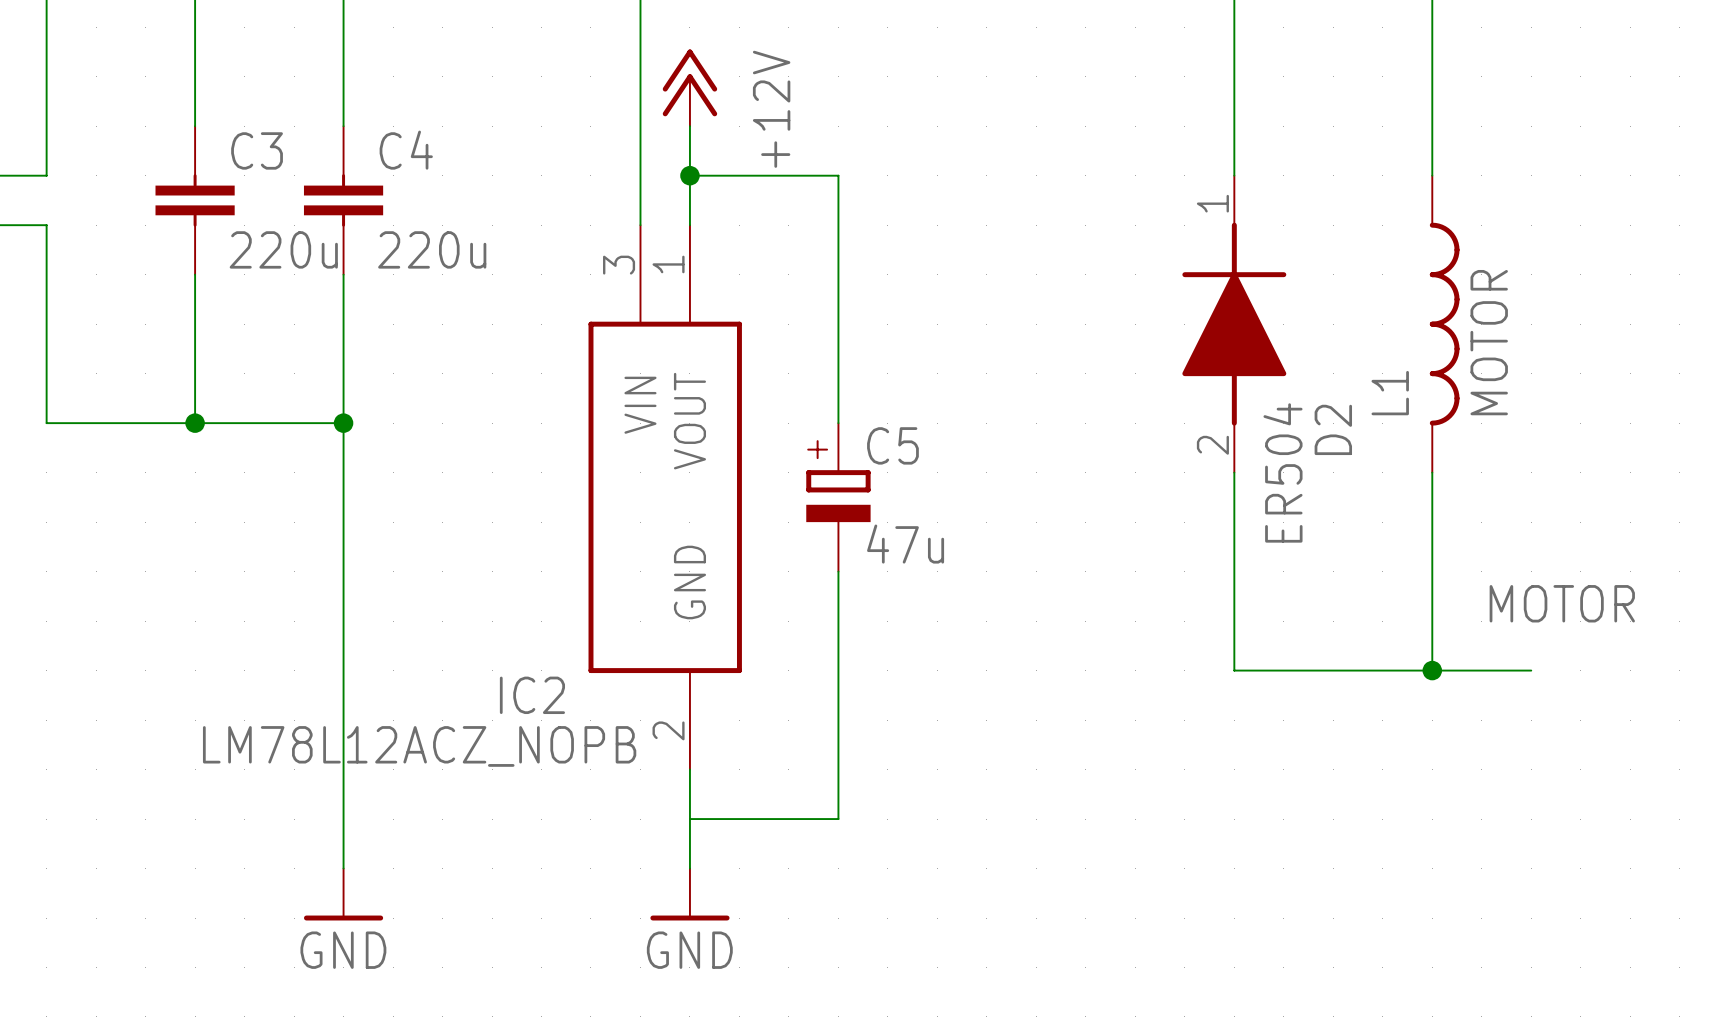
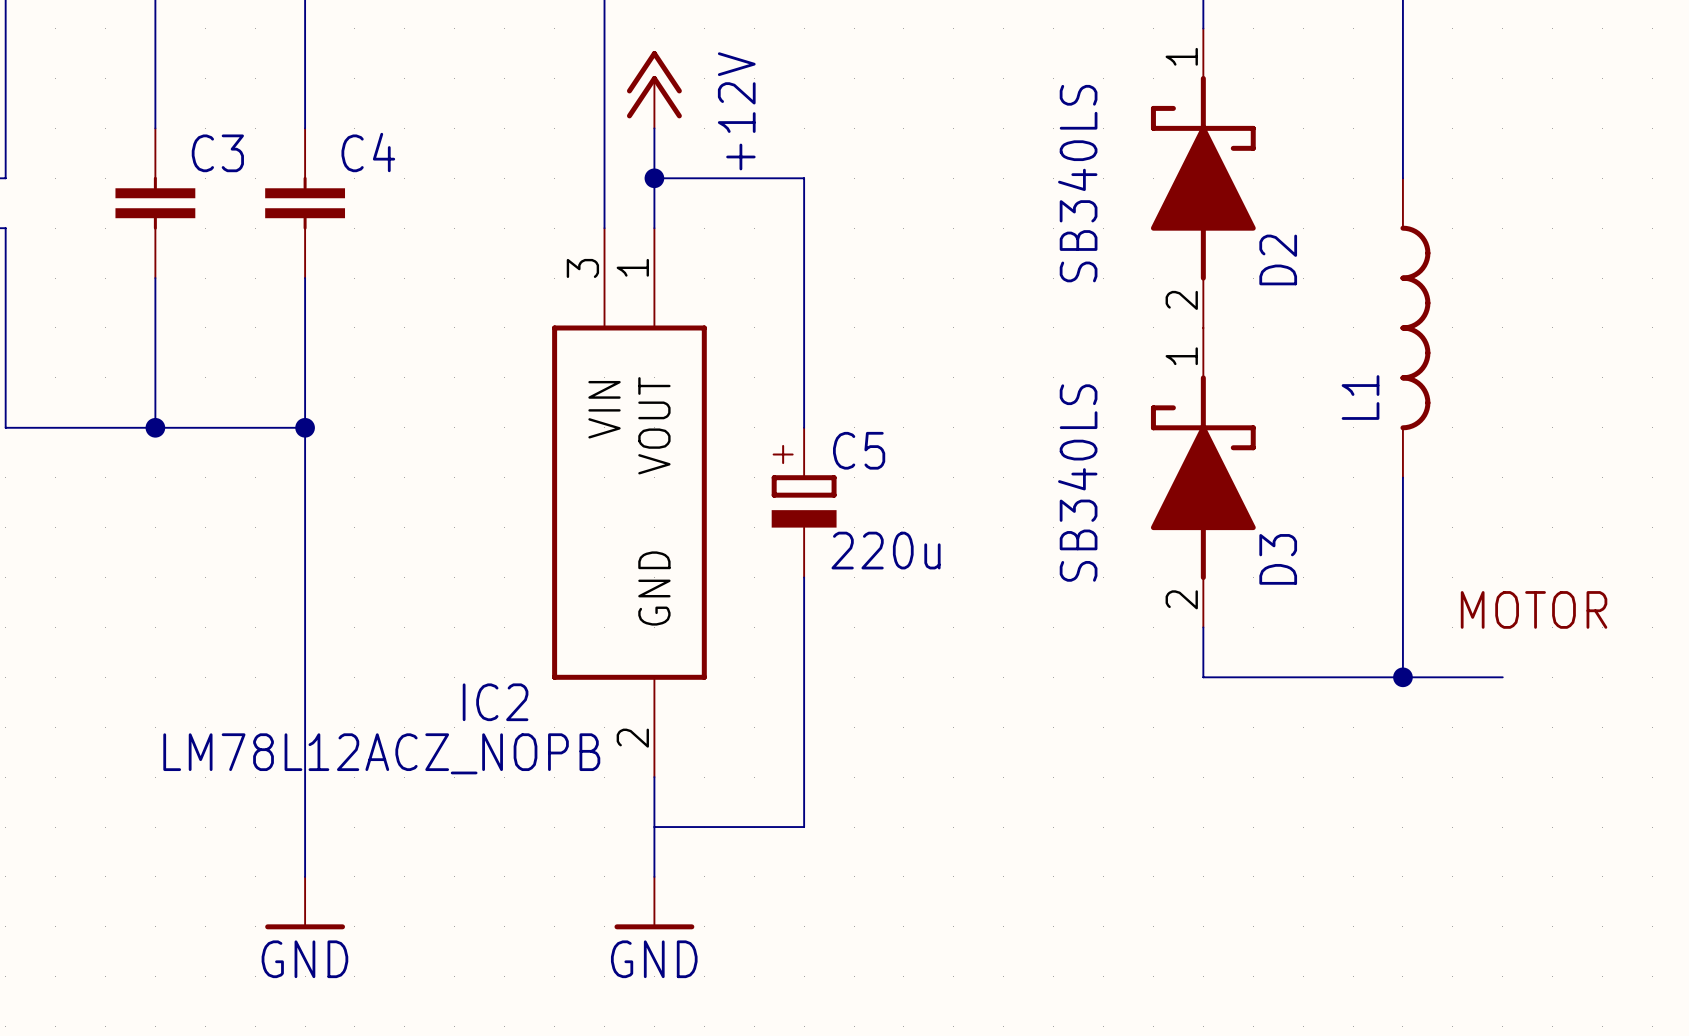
D2 symbol: [1182, 175, 1287, 473] -> [1150, 28, 1256, 328]
C3 value: 220u (283, 249) -> none
C4 value: 220u (432, 249) -> none
L1 value: MOTOR (1489, 342) -> none
D3: none -> SB340LS (1203, 477)
D2 value: ER504 (1283, 472) -> SB340LS (1077, 183)
C5 value: 47u (905, 544) -> 220u (886, 550)

